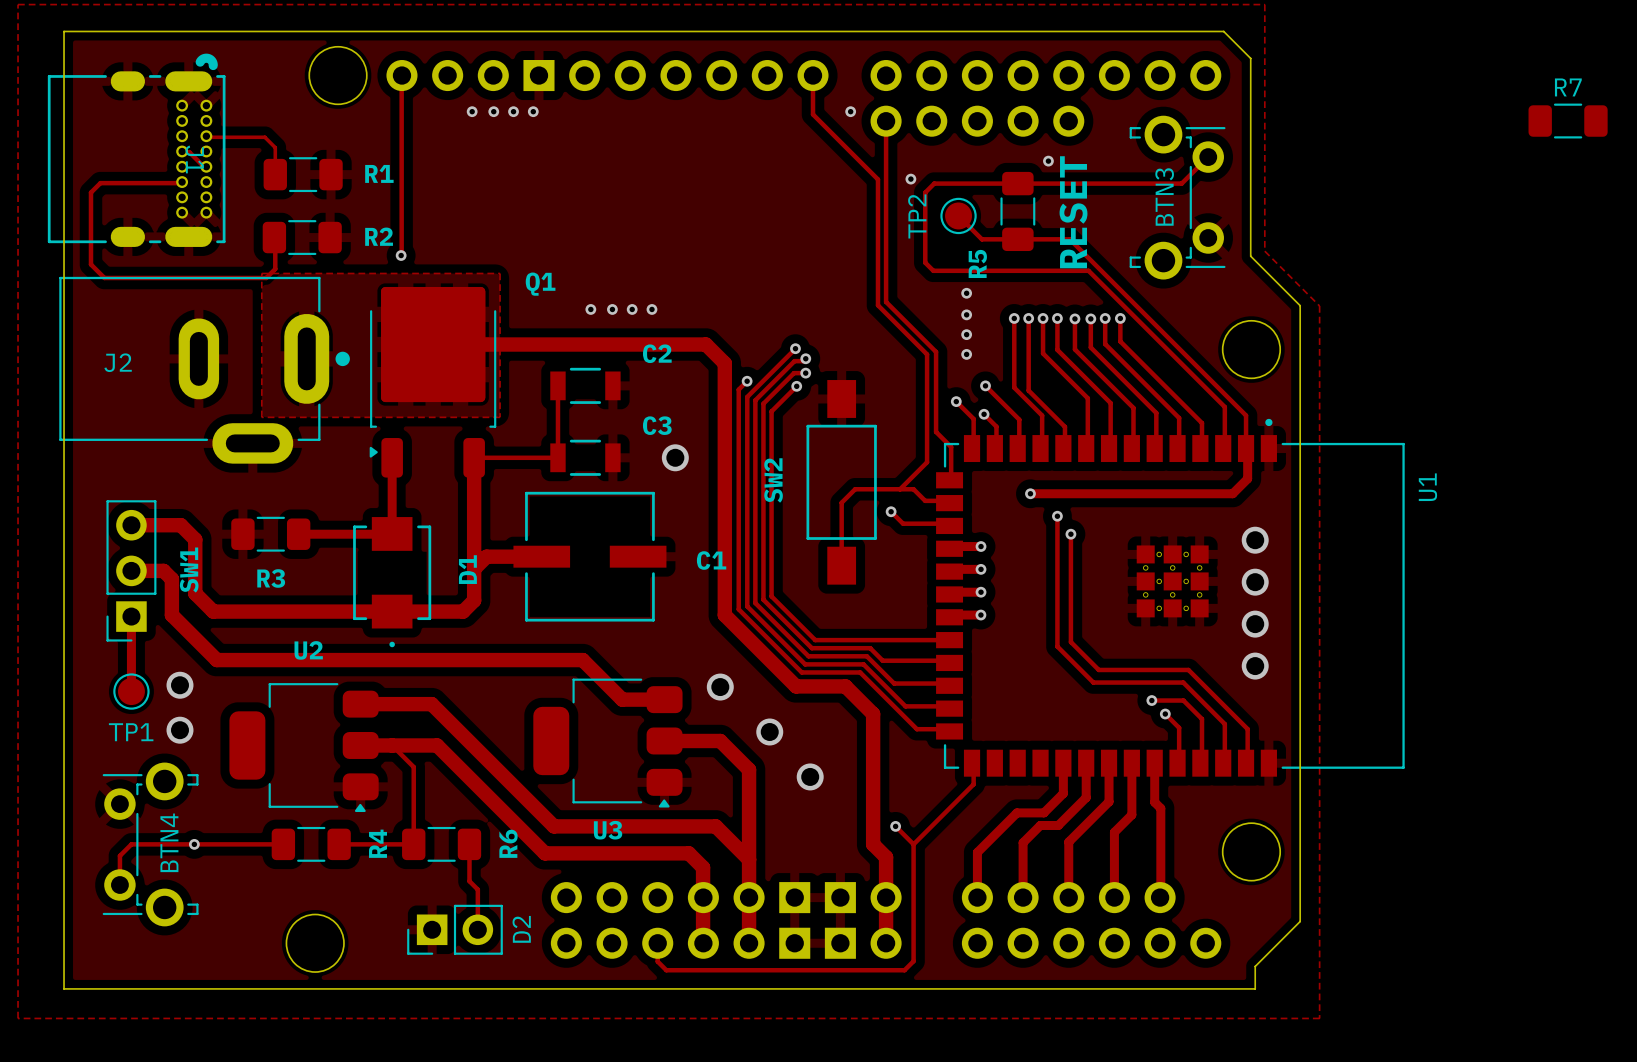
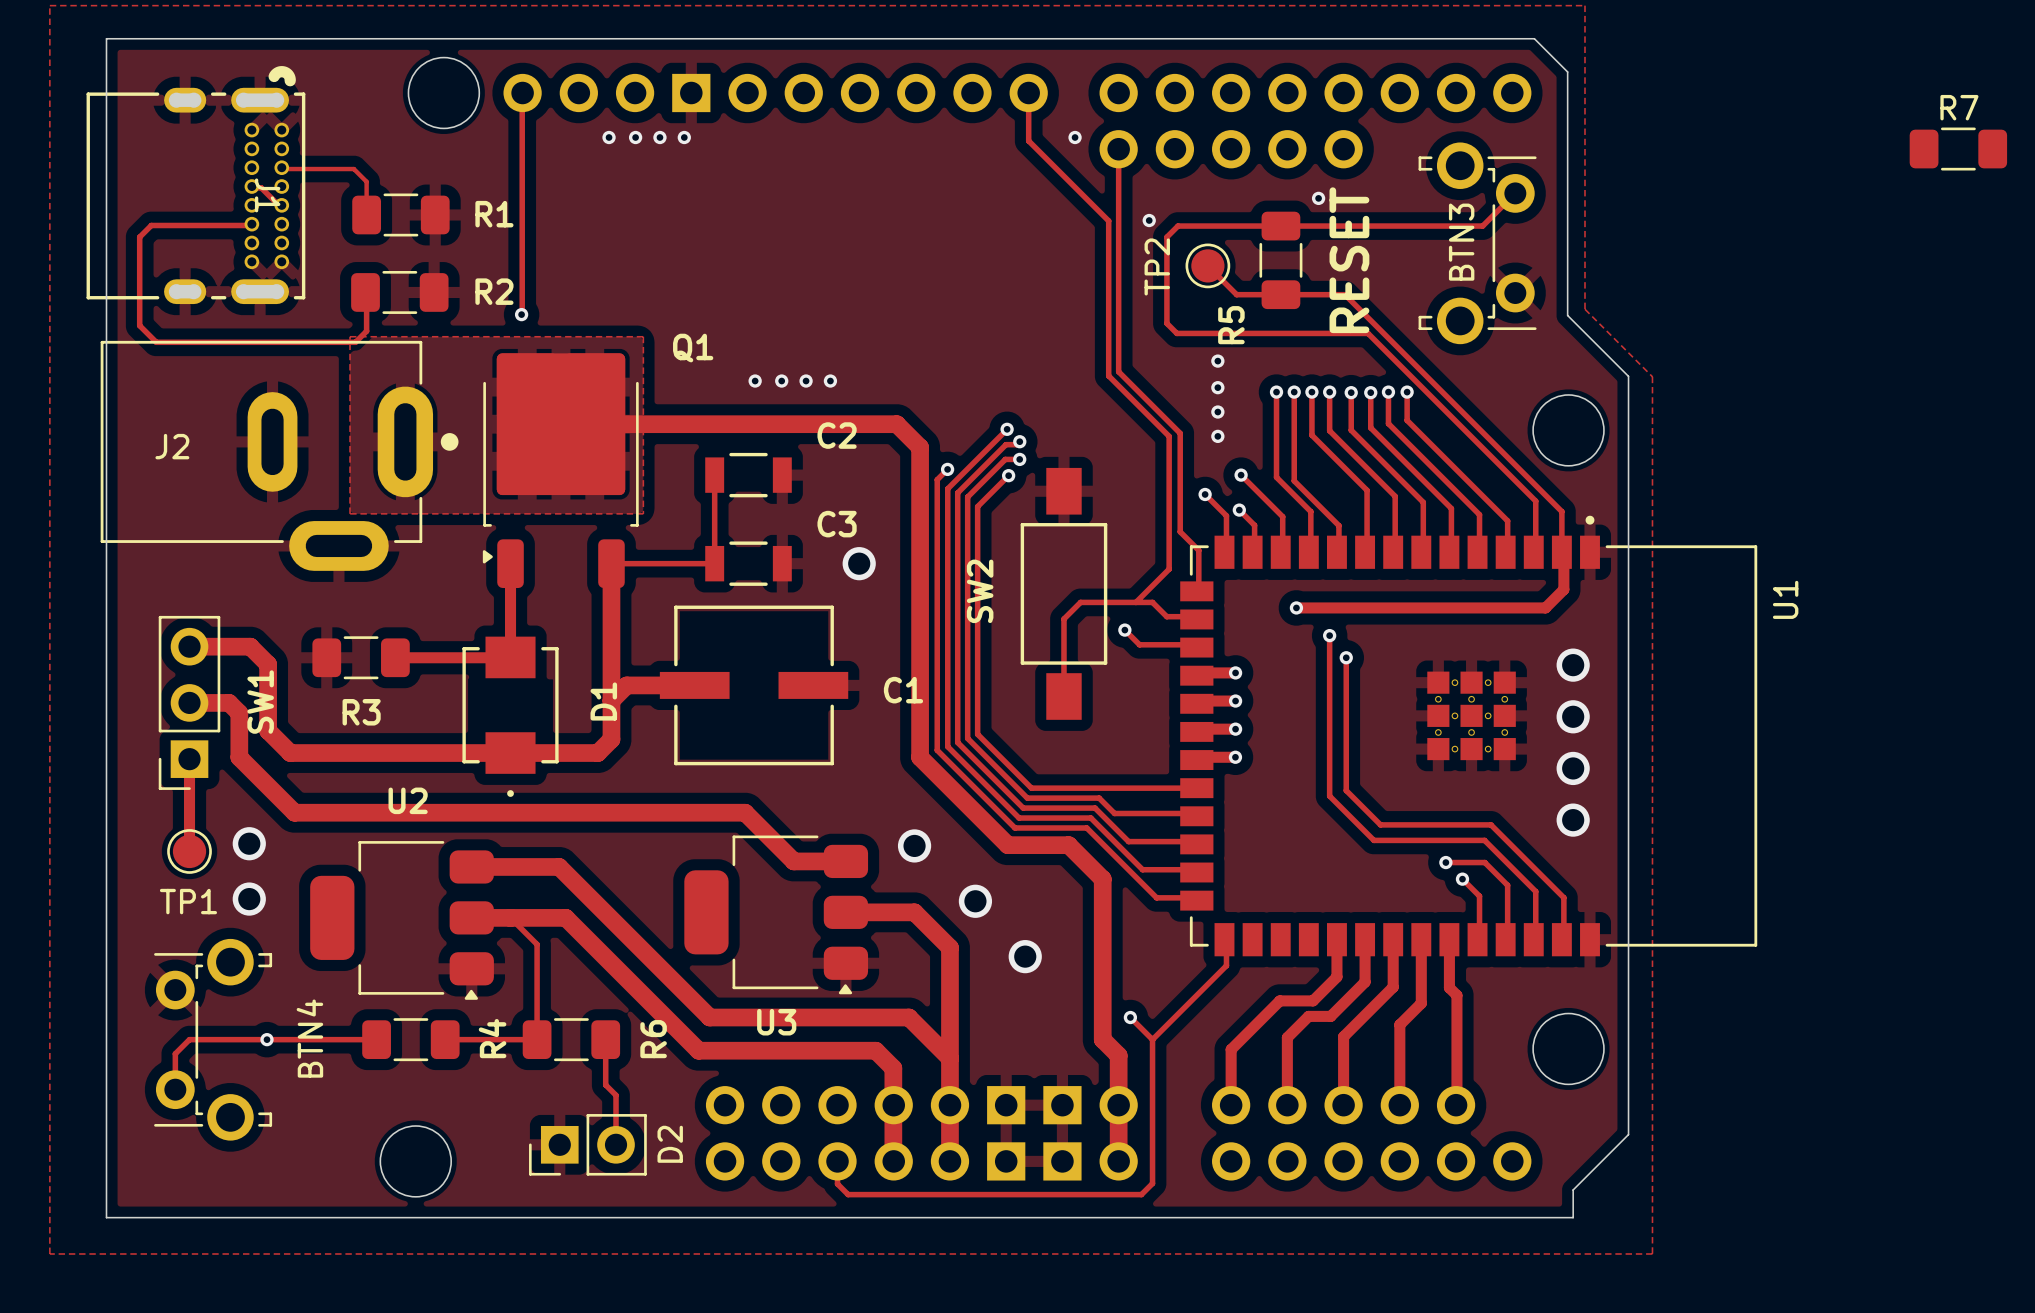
BTN4 name position: BTN4 (169, 842) -> BTN4 (309, 1038)

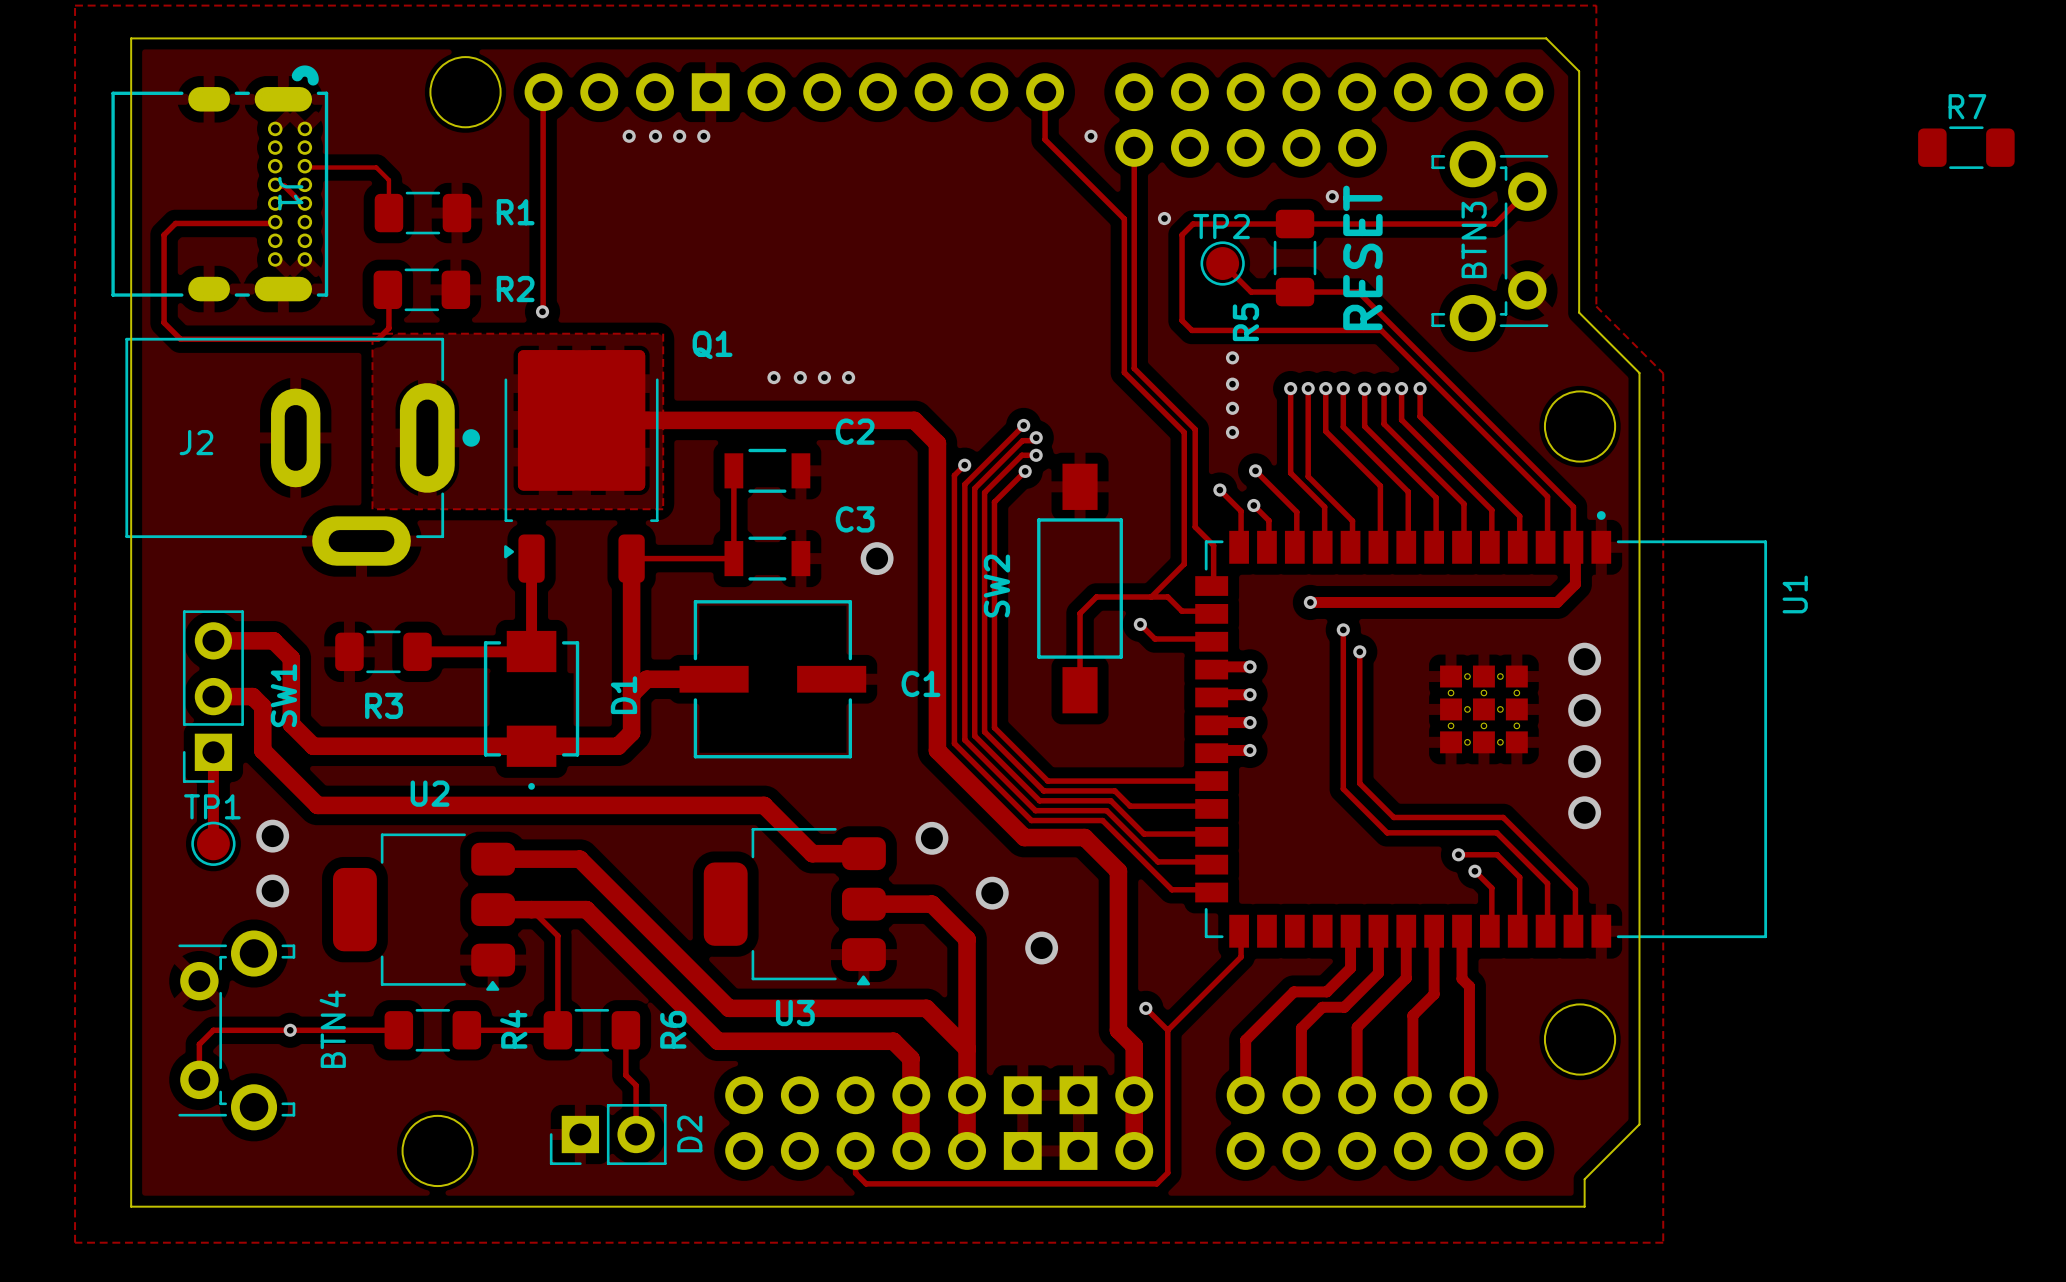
TP2 name rotation: 0° (1157, 266) -> 90° clockwise (1221, 226)
TP1 name position: TP1 (188, 901) -> TP1 (212, 806)

